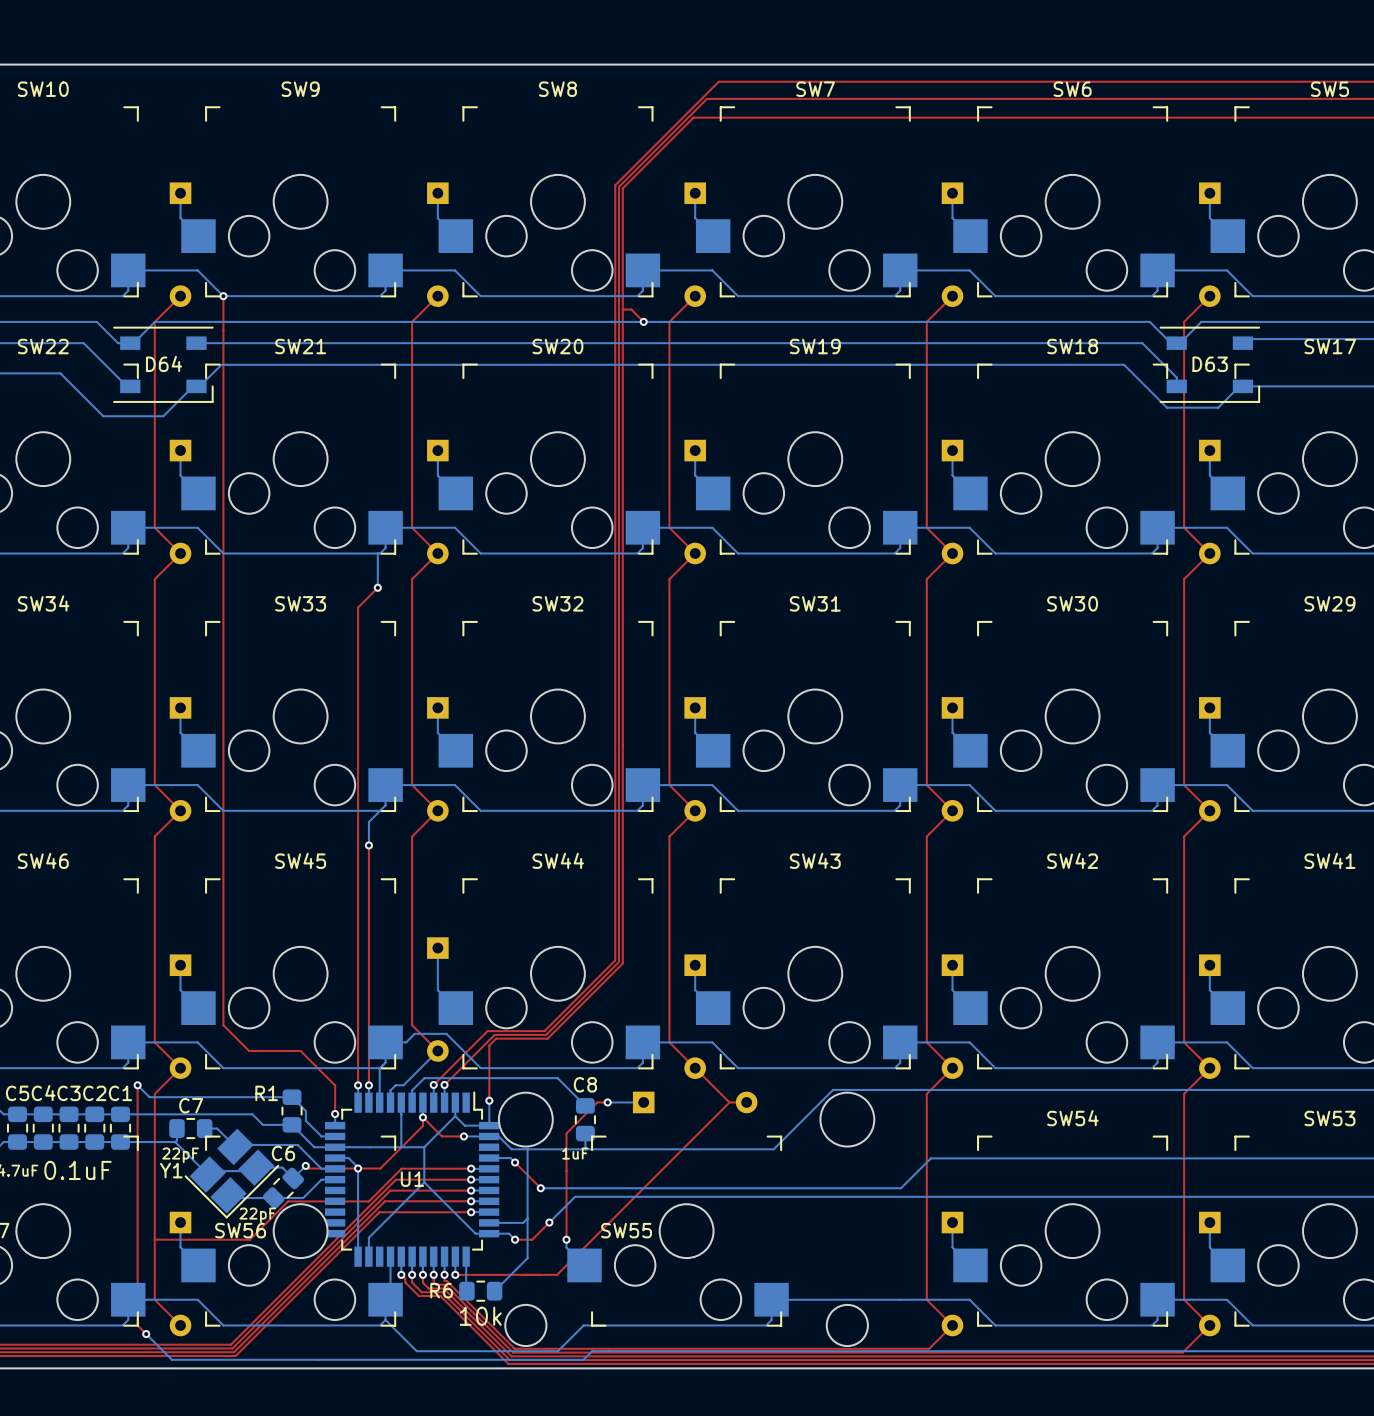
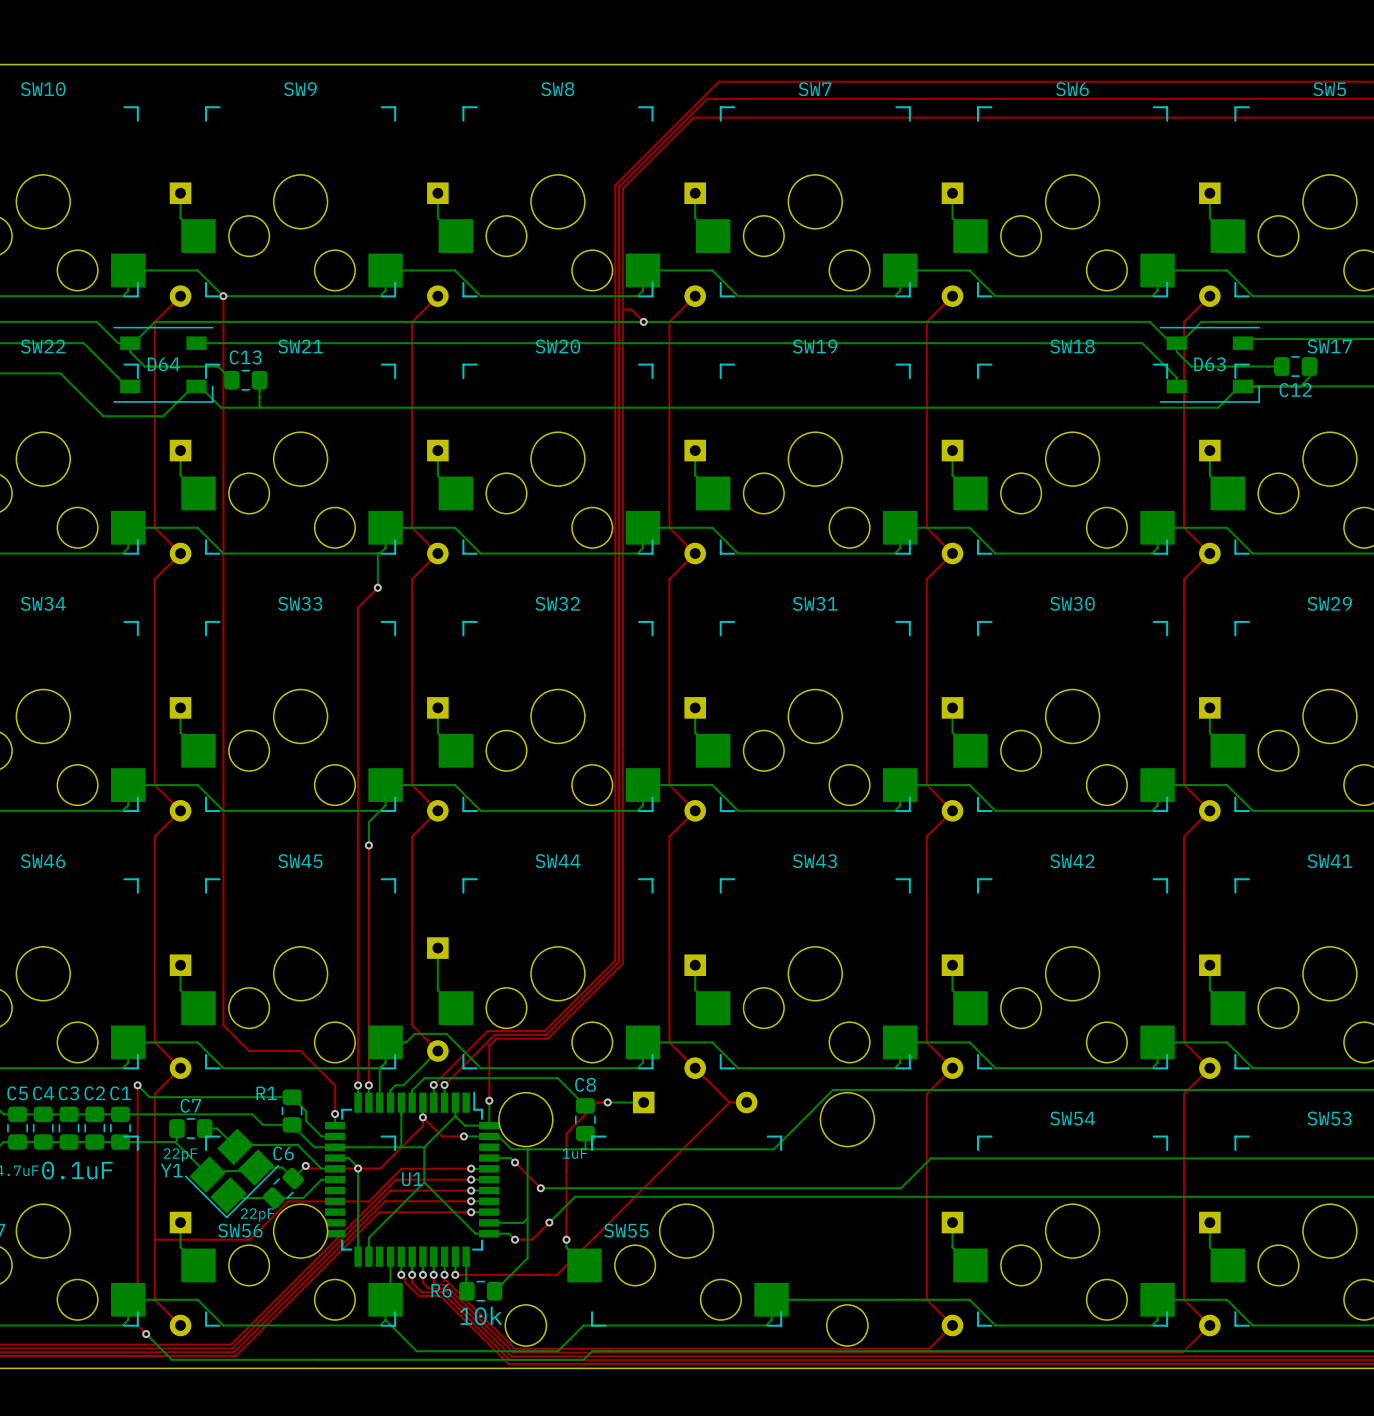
bottom track: none -> (130, 343) (130, 351) (144, 366) (218, 366) (231, 380)
bottom track: none -> (1176, 343) (1176, 351) (1191, 366) (1281, 366)
C12: none -> (1295, 366)
bottom track: none -> (1309, 366) (1309, 377) (1300, 386)
C13: none -> (245, 380)
bottom track: none -> (259, 380) (259, 407)
bottom track: (199, 386) (221, 364) (1124, 364) (1166, 407) -> (199, 386) (221, 407) (1166, 407)

